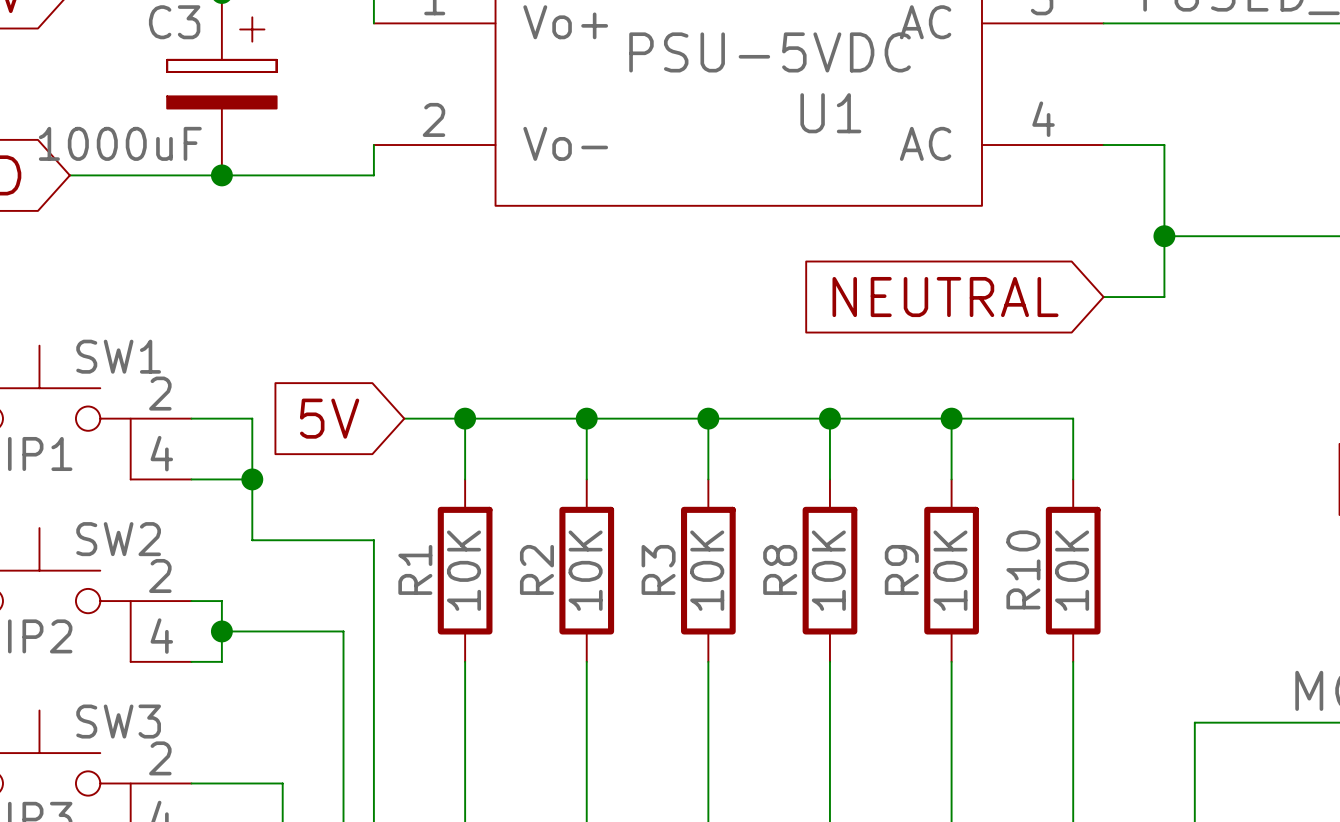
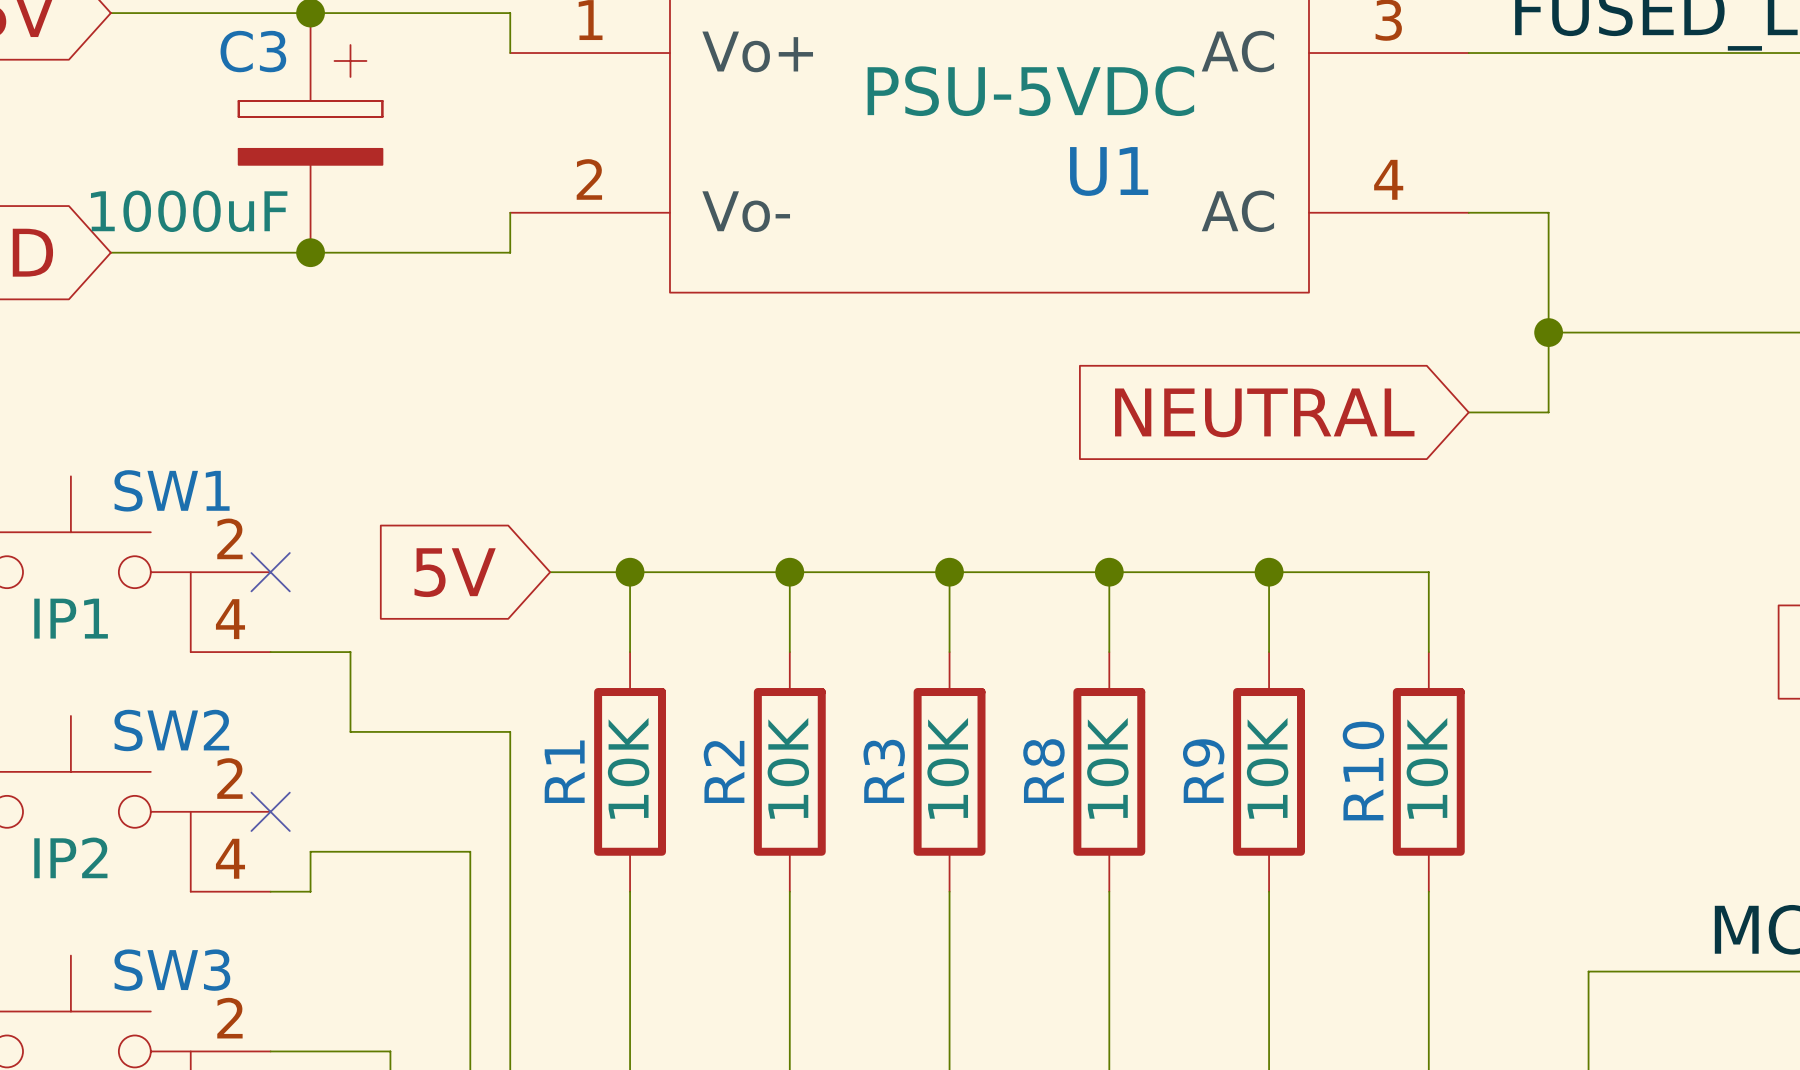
wire: (191, 418) (252, 418) (252, 479) -> none
no-connect mark: none -> (270, 572)
junction: (252, 479) -> none
wire: (191, 601) (221, 601) (221, 631) -> none
no-connect mark: none -> (270, 811)
junction: (221, 631) -> none

